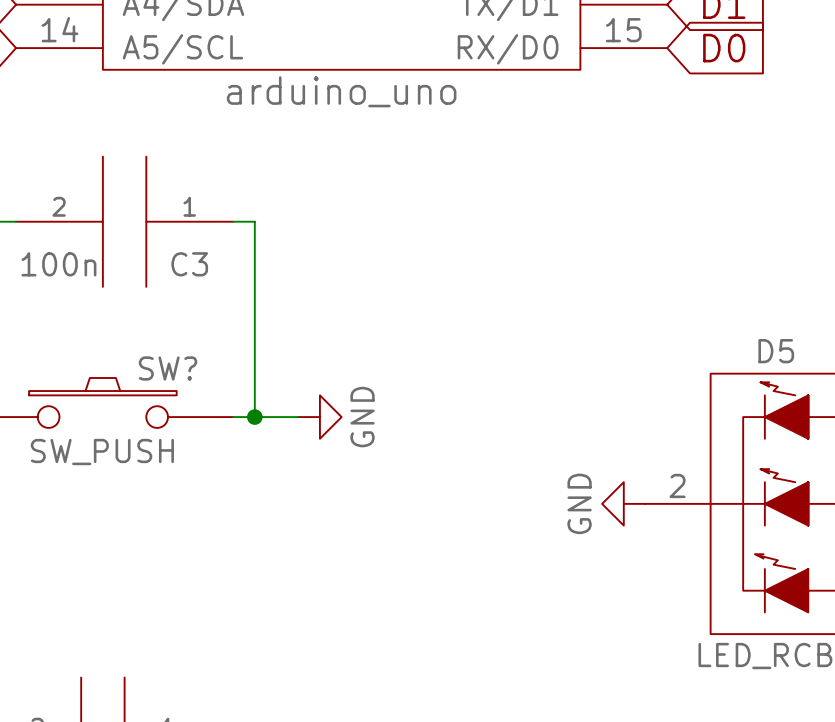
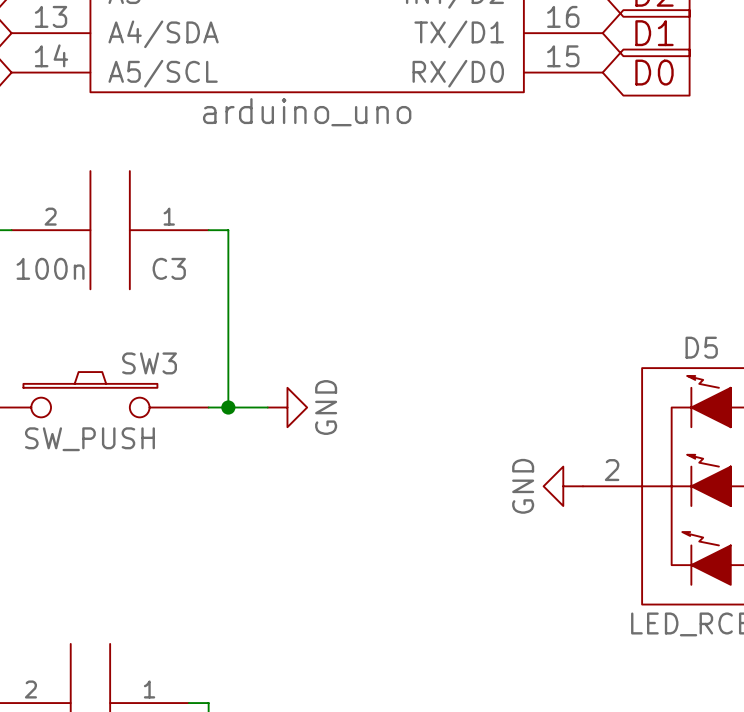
SW? name: SW? (168, 368) -> SW3 (149, 363)

